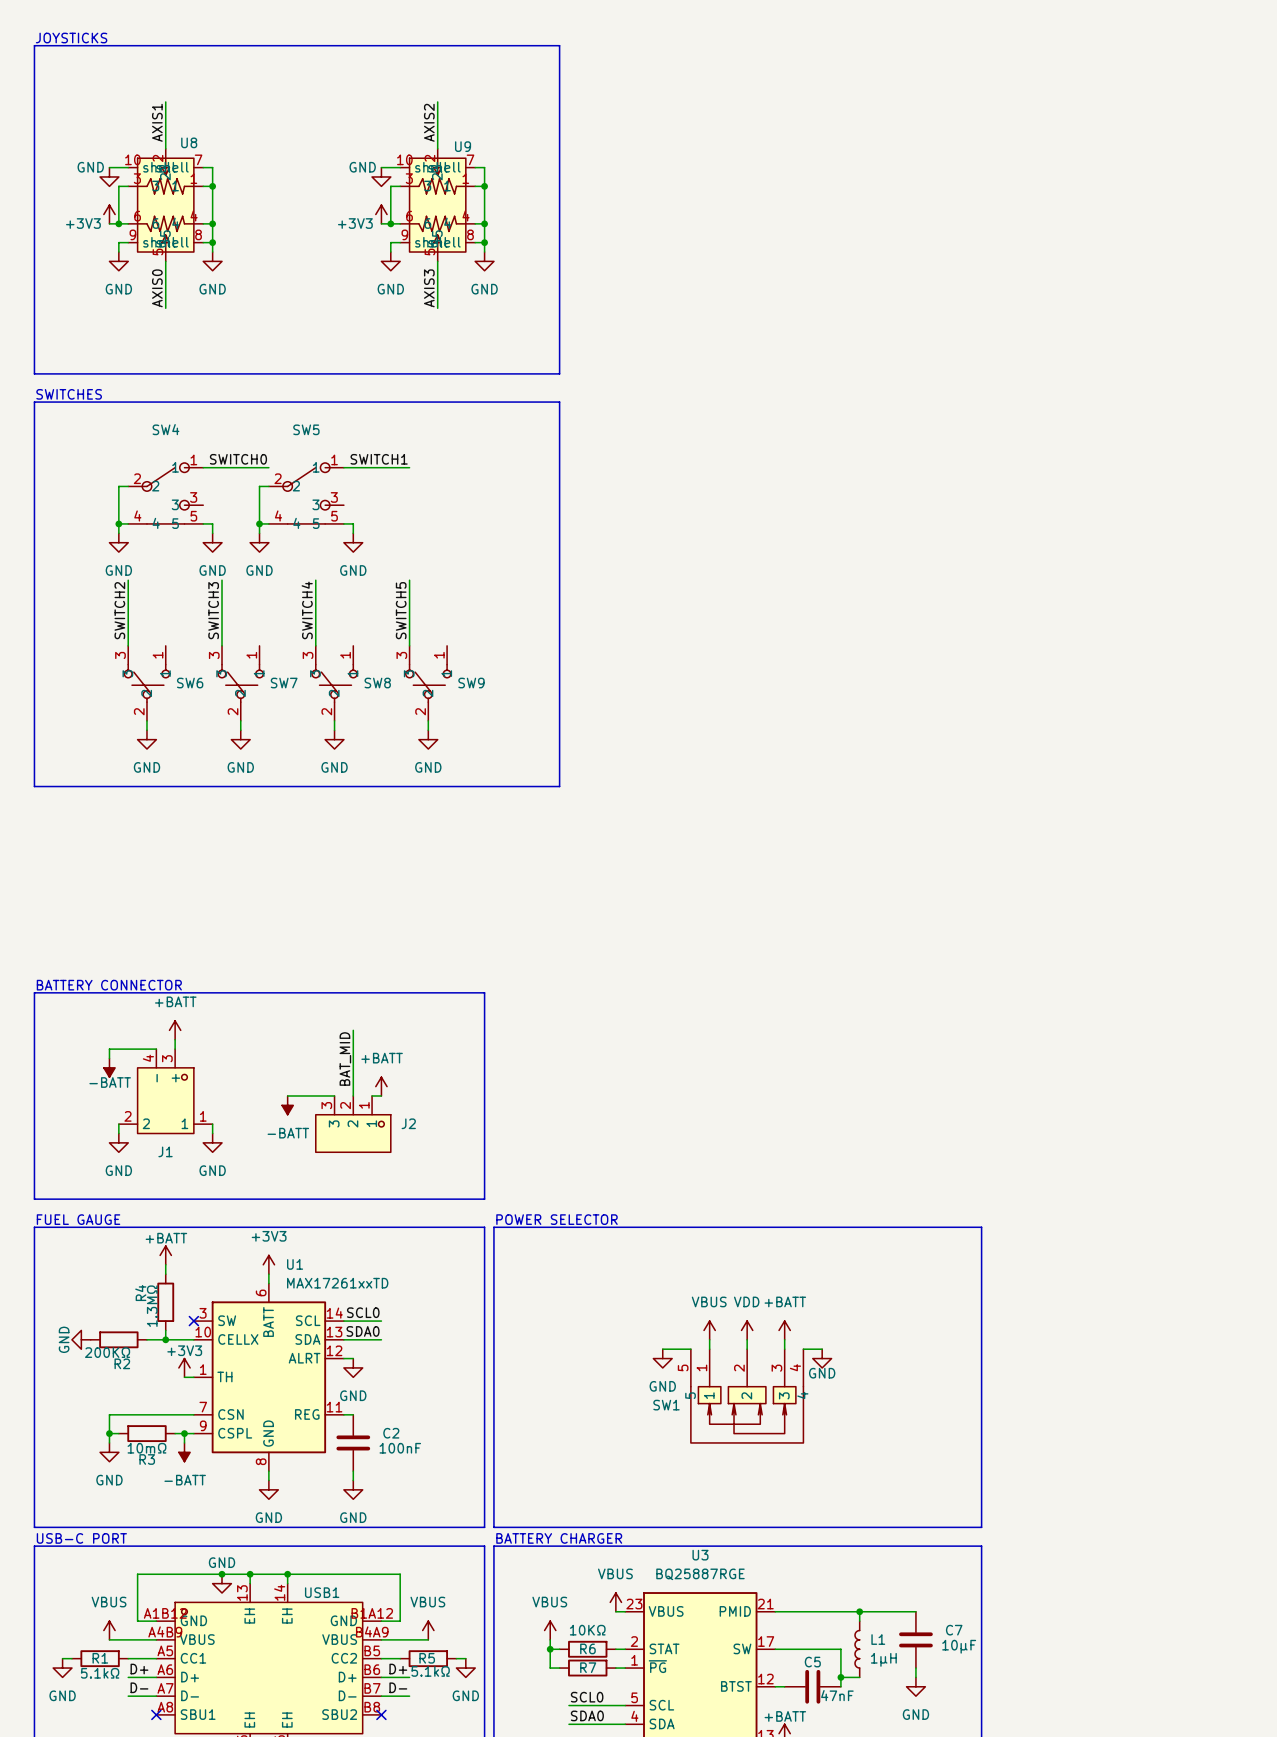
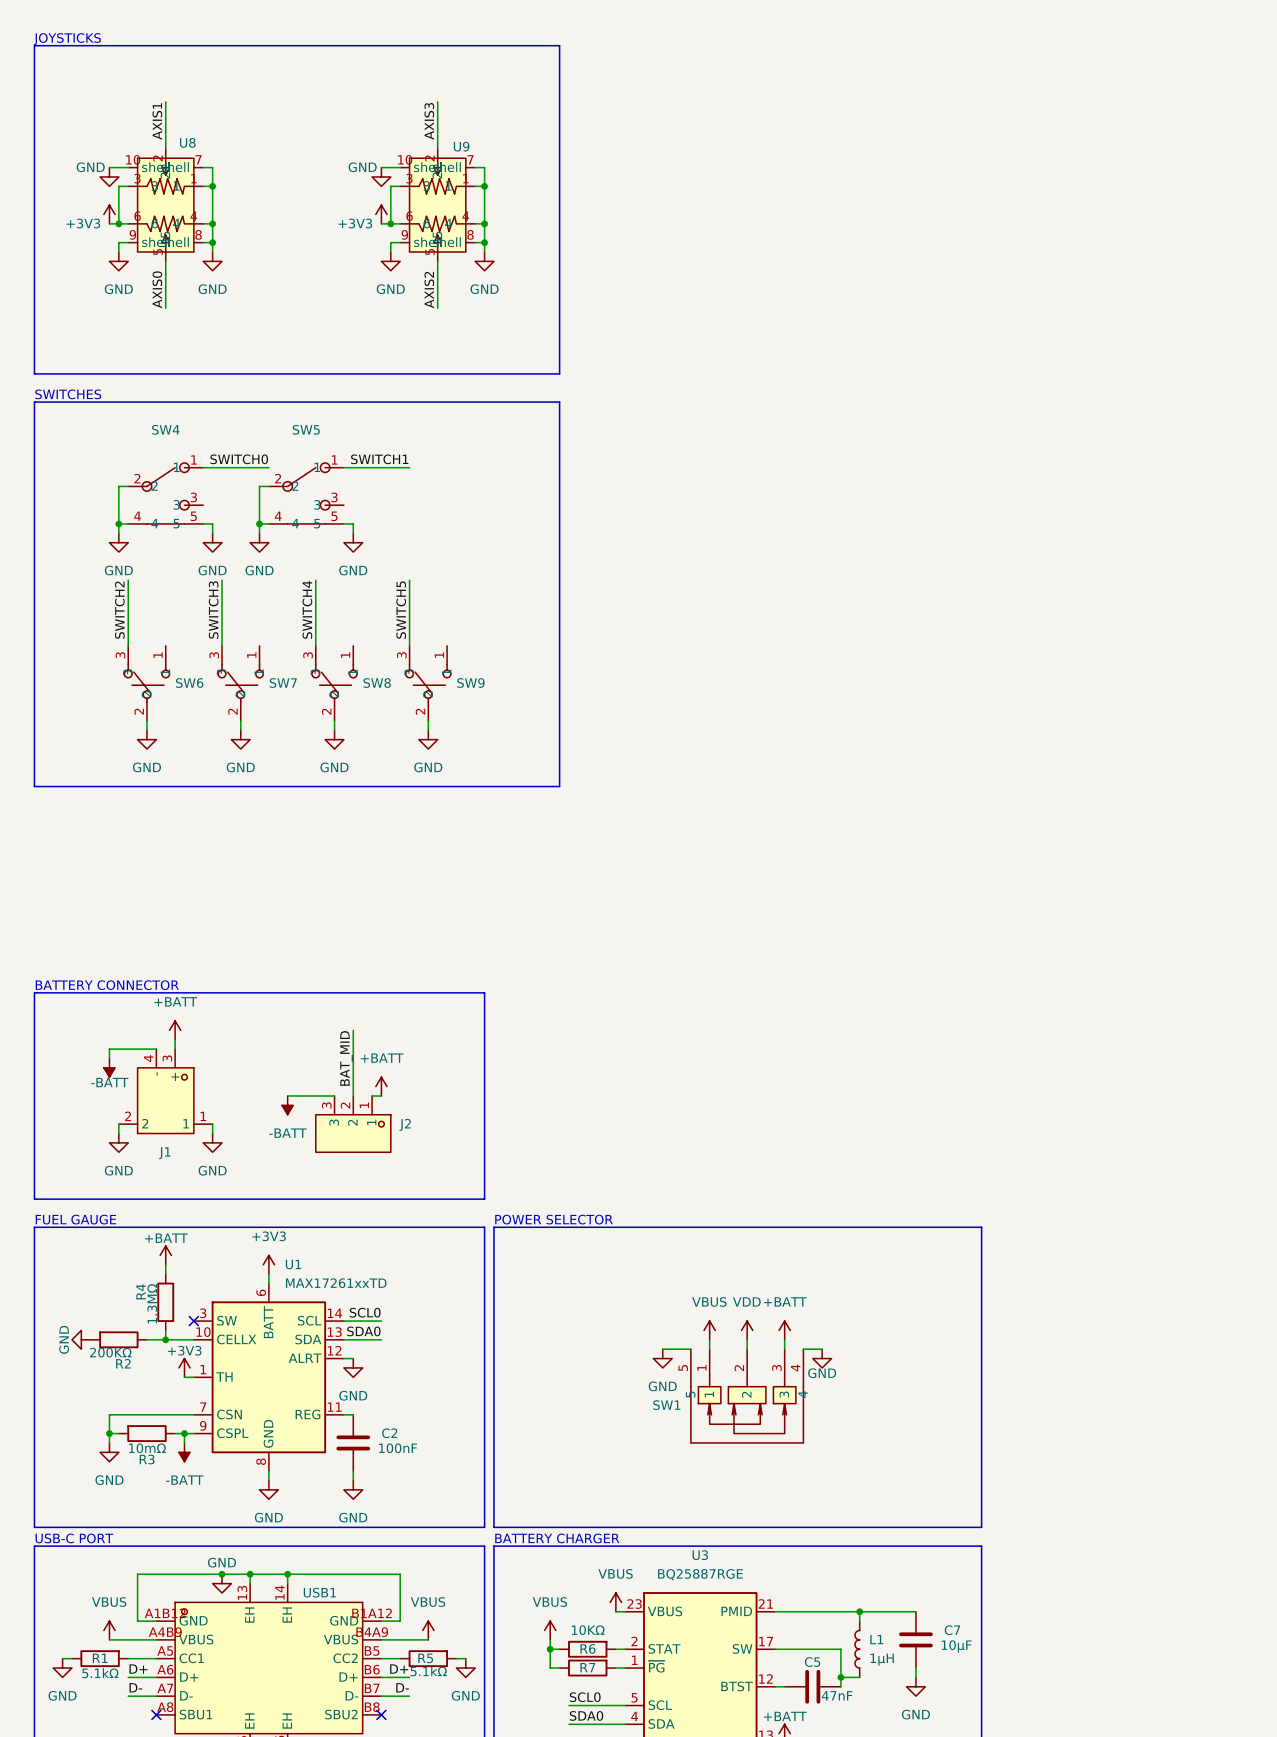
label: AXIS2 (429, 122) -> AXIS3 (429, 121)
label: AXIS3 (429, 288) -> AXIS2 (429, 289)

